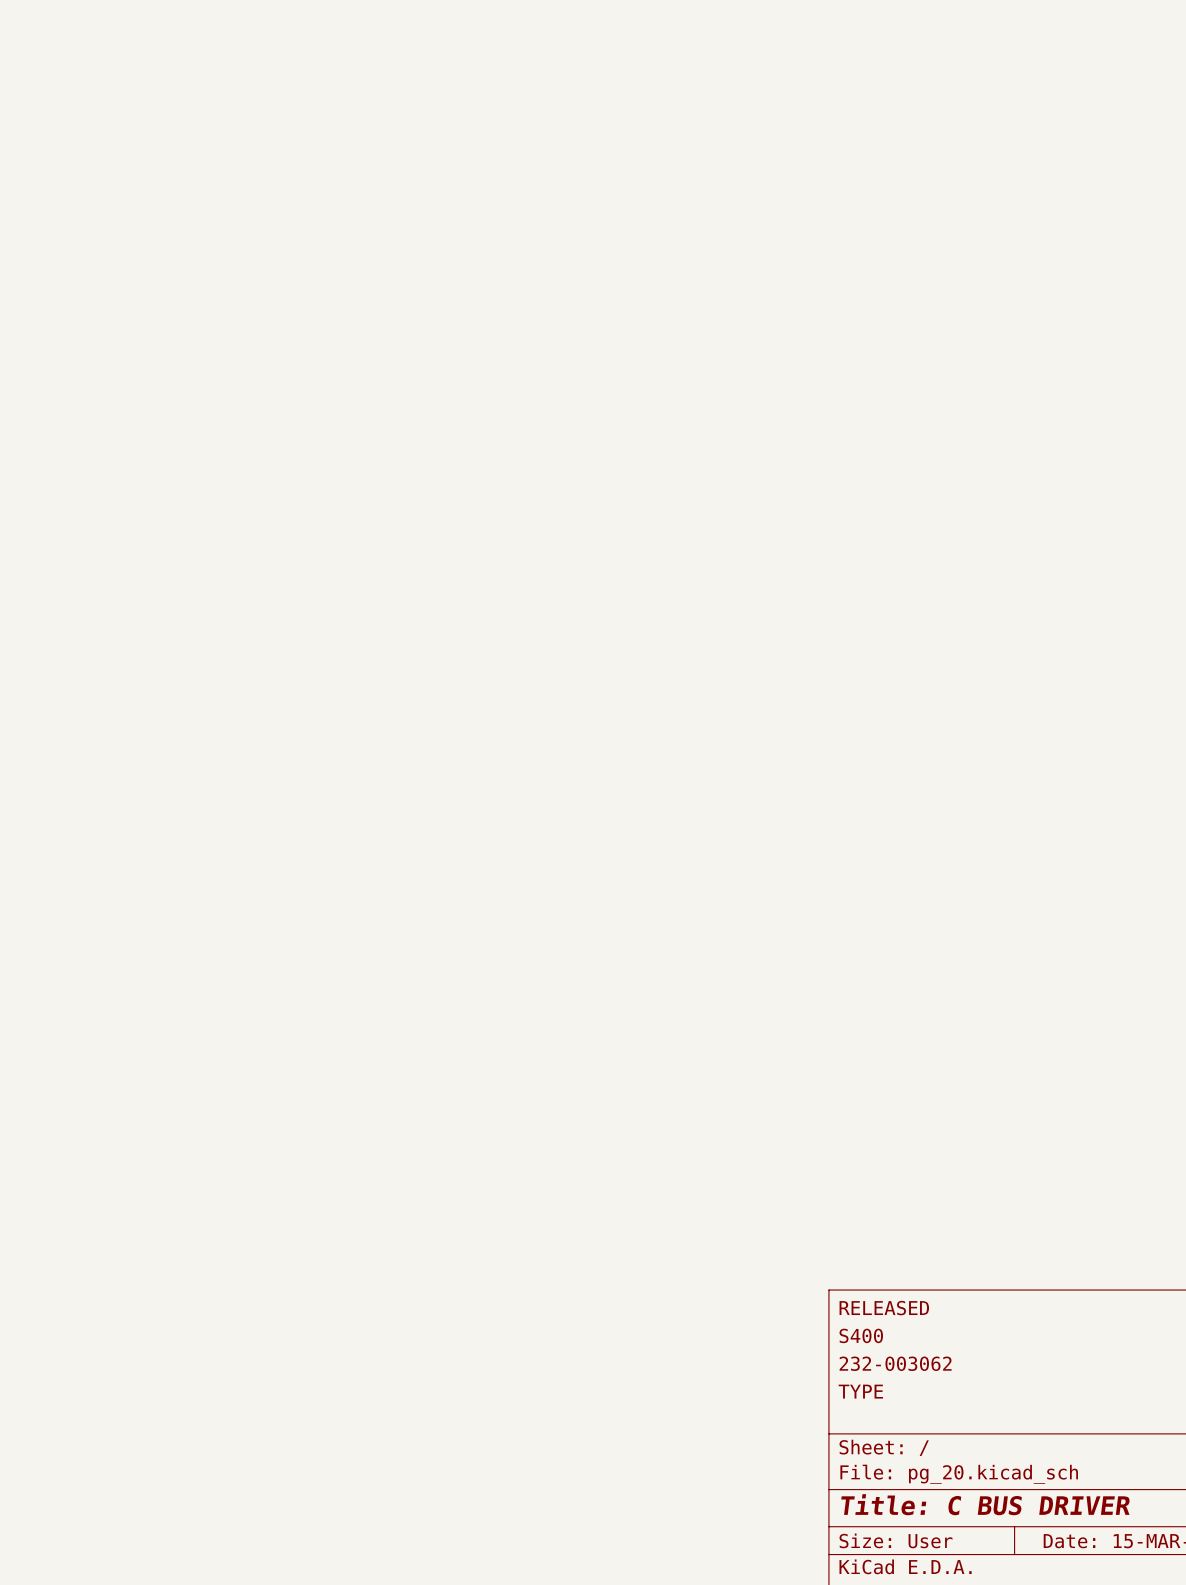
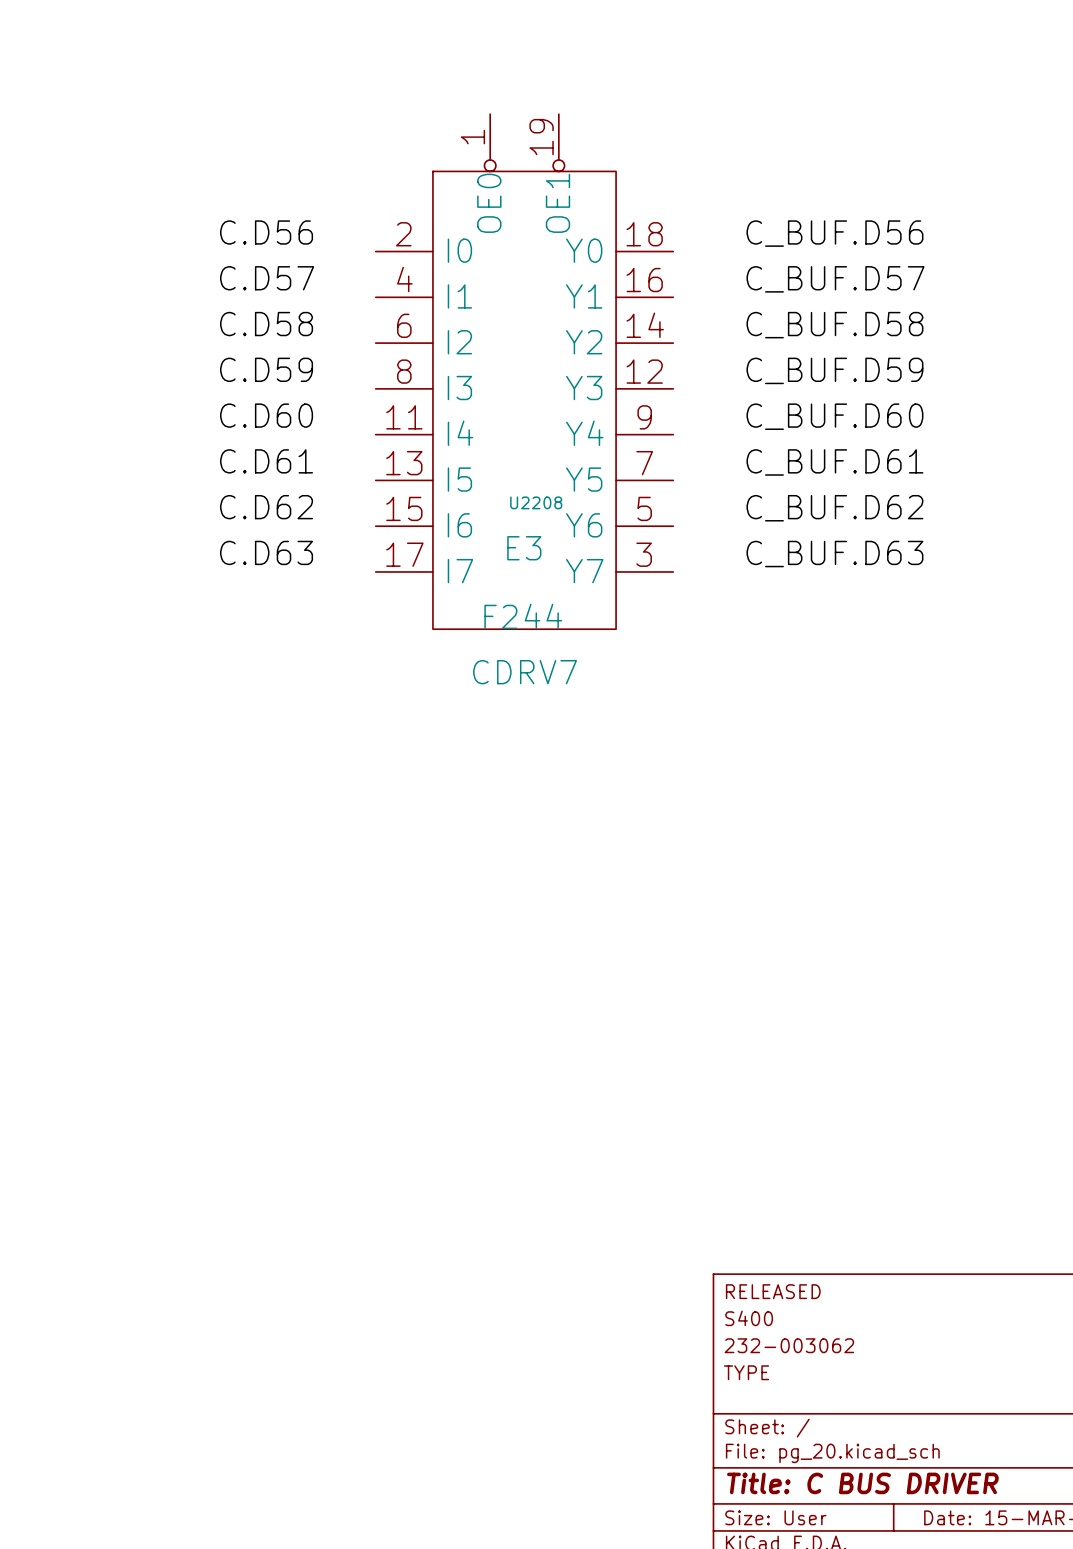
label: none -> C.D56 (266, 232)
label: none -> C_BUF.D56 (834, 233)
label: none -> C.D57 (267, 278)
label: none -> C_BUF.D57 (835, 279)
label: none -> C.D58 (266, 324)
label: none -> C_BUF.D58 (834, 325)
label: none -> C.D59 (266, 369)
U2208: none -> F244 (524, 371)
label: none -> C_BUF.D59 (834, 370)
label: none -> C.D60 (266, 415)
label: none -> C_BUF.D60 (834, 416)
label: none -> C.D61 (266, 461)
label: none -> C_BUF.D61 (834, 462)
label: none -> C.D62 (266, 507)
label: none -> C_BUF.D62 (834, 508)
label: none -> C.D63 (266, 552)
label: none -> C_BUF.D63 (834, 554)

